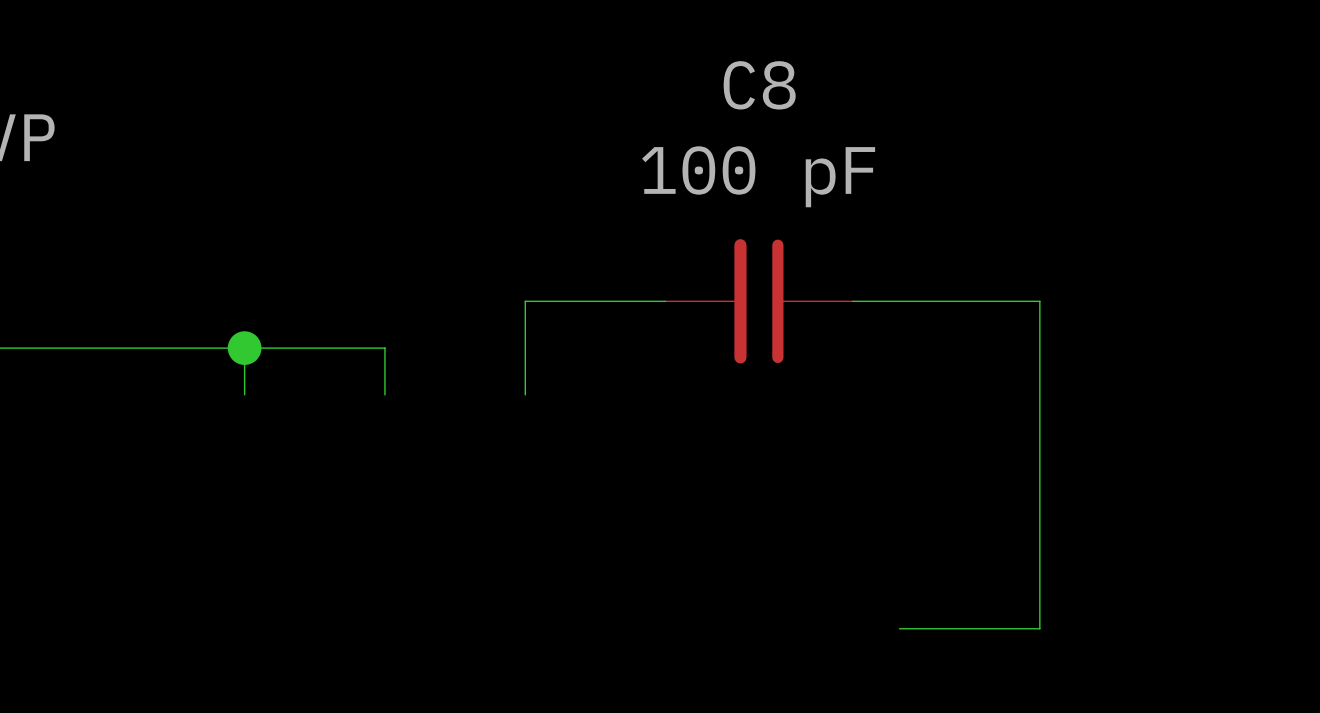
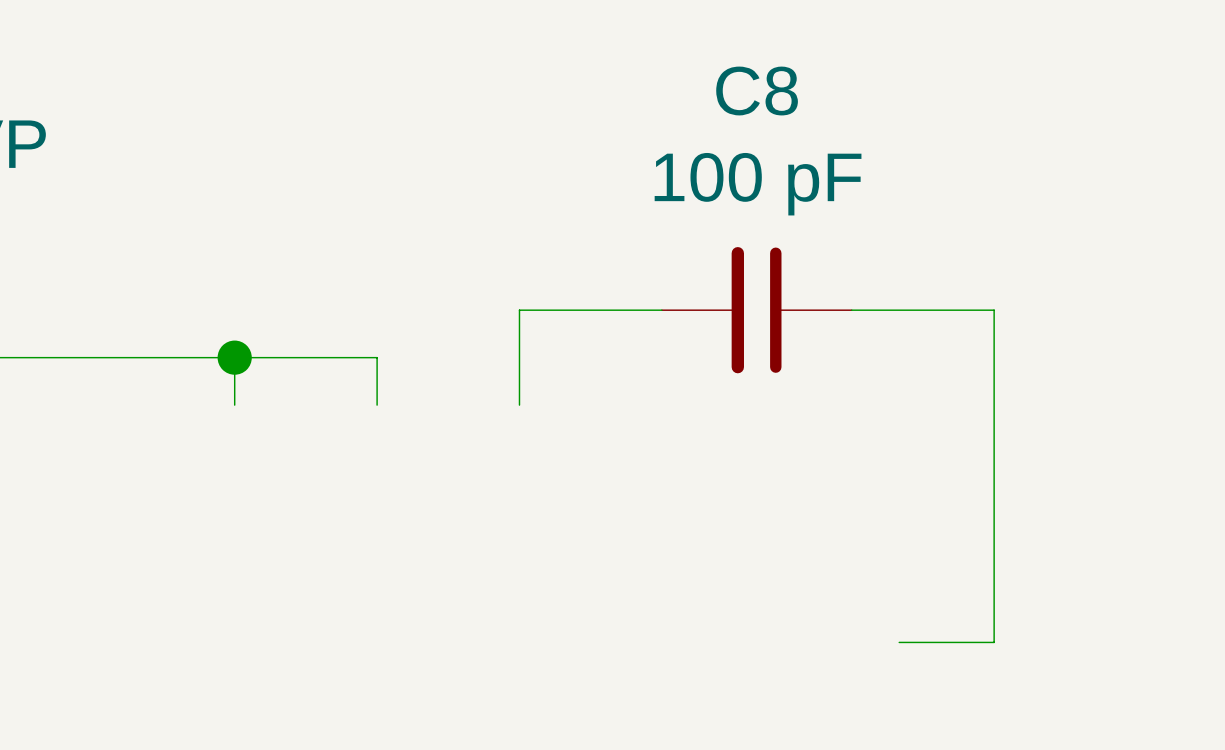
wire: (993, 301) (1039, 301) (1039, 628) (993, 628) -> (994, 310) (994, 642)

